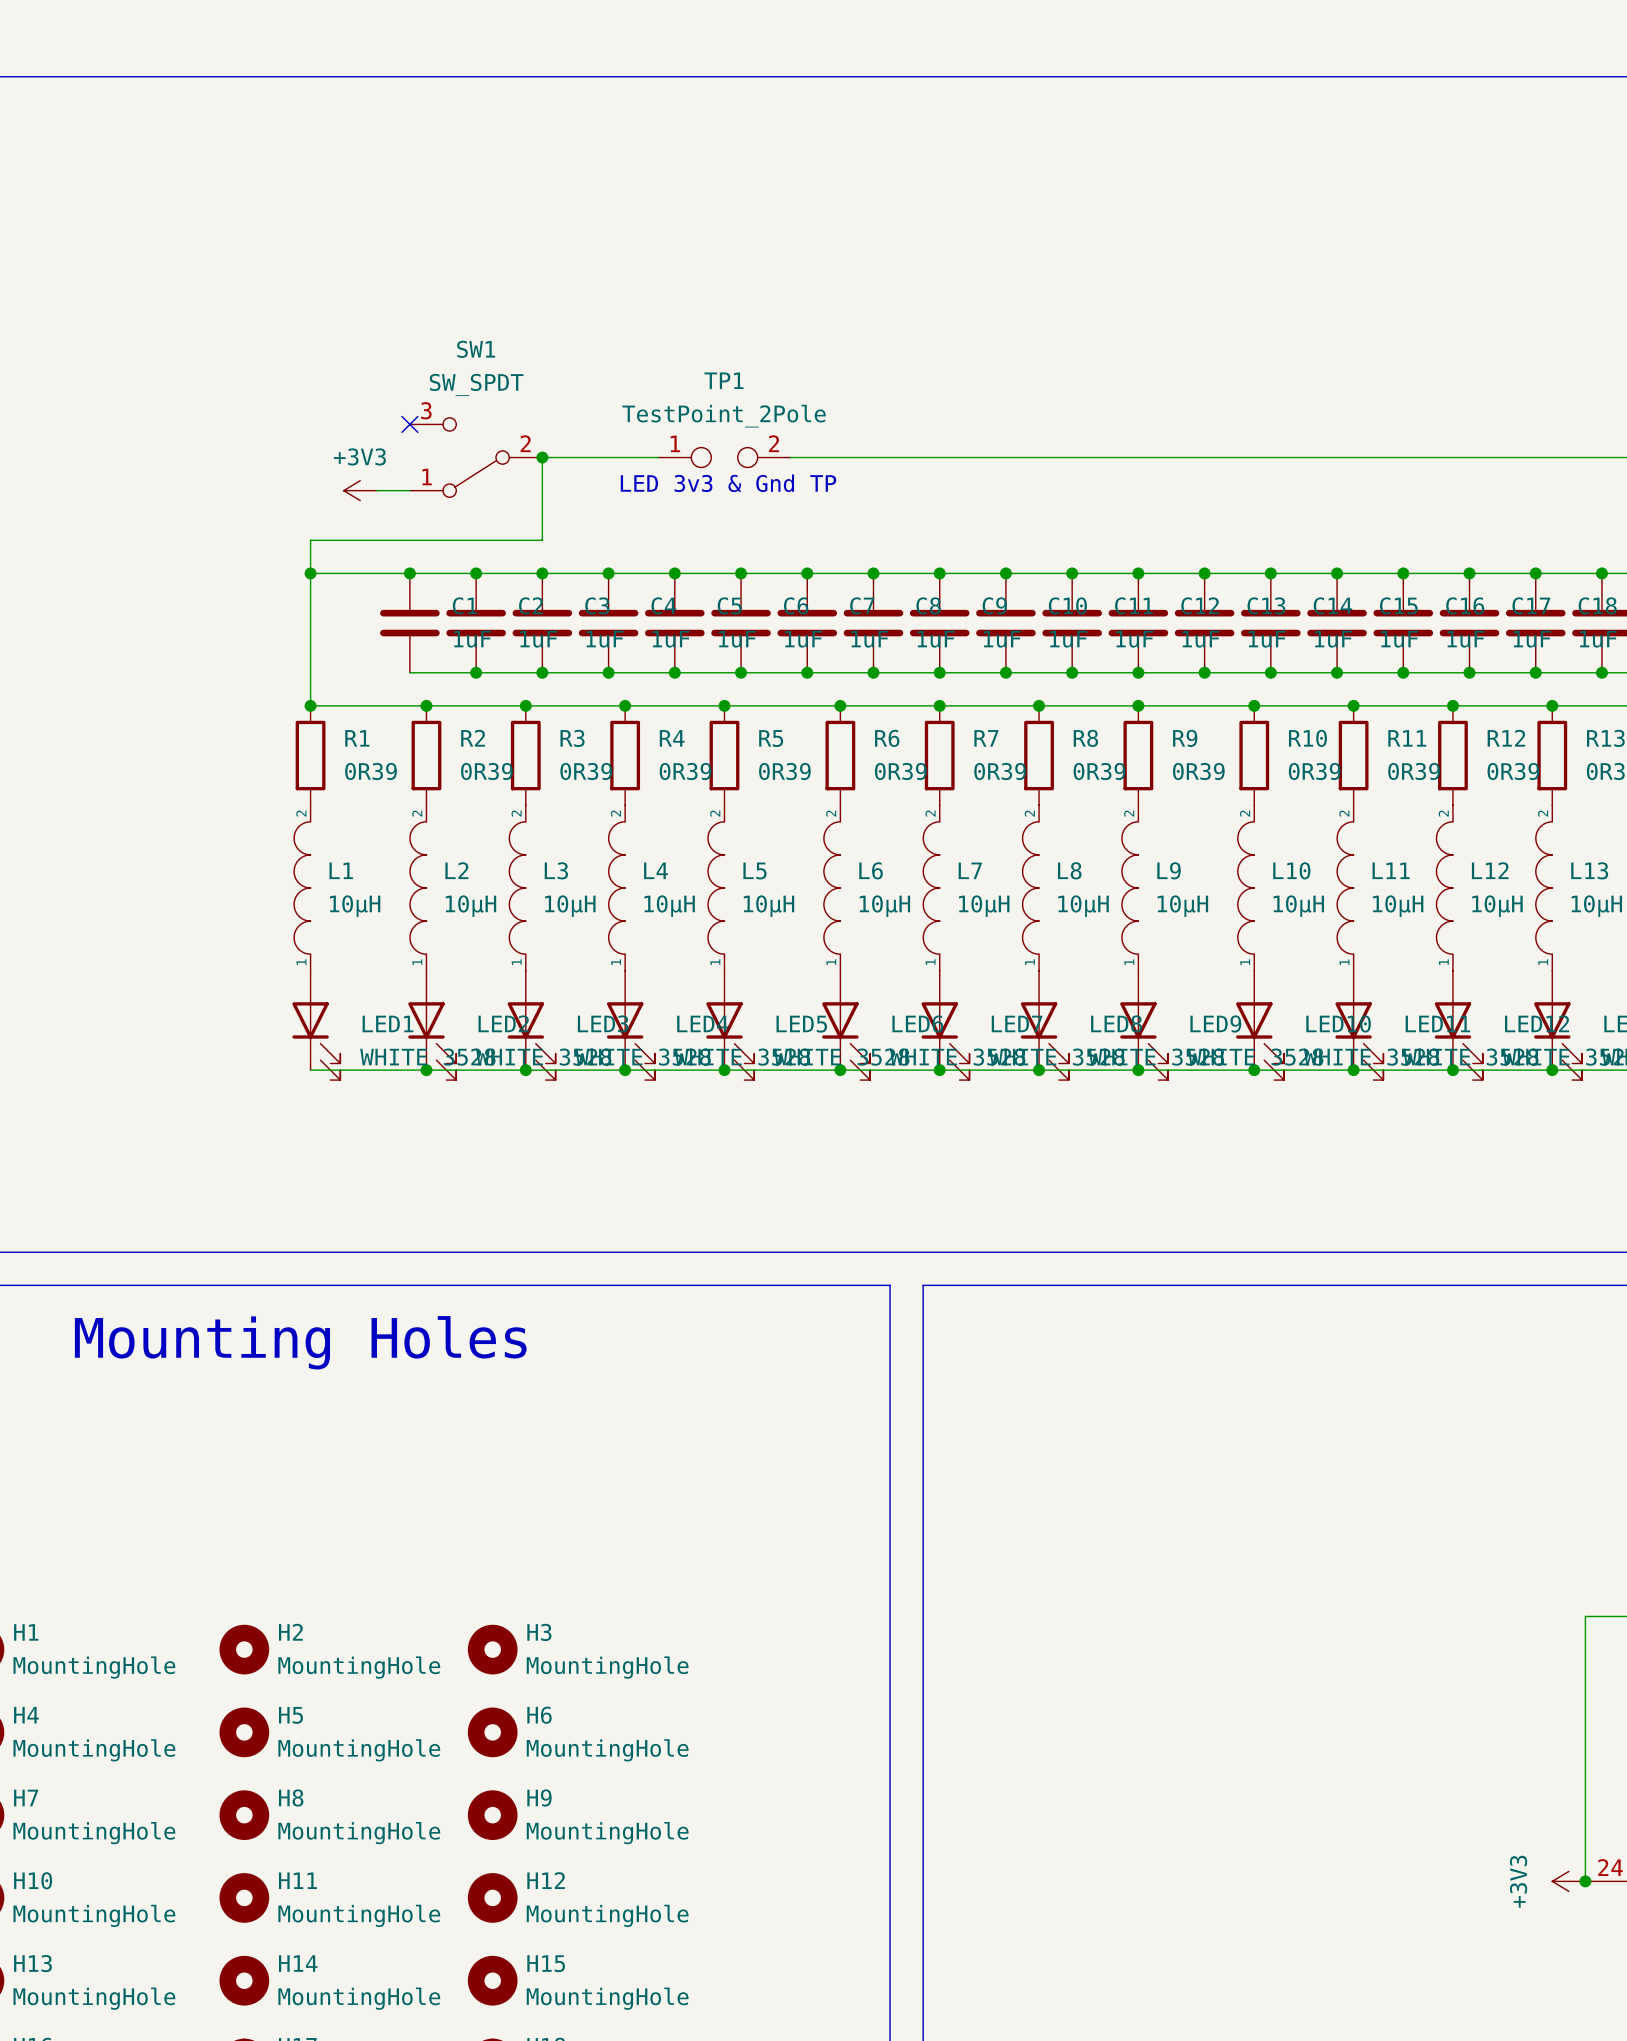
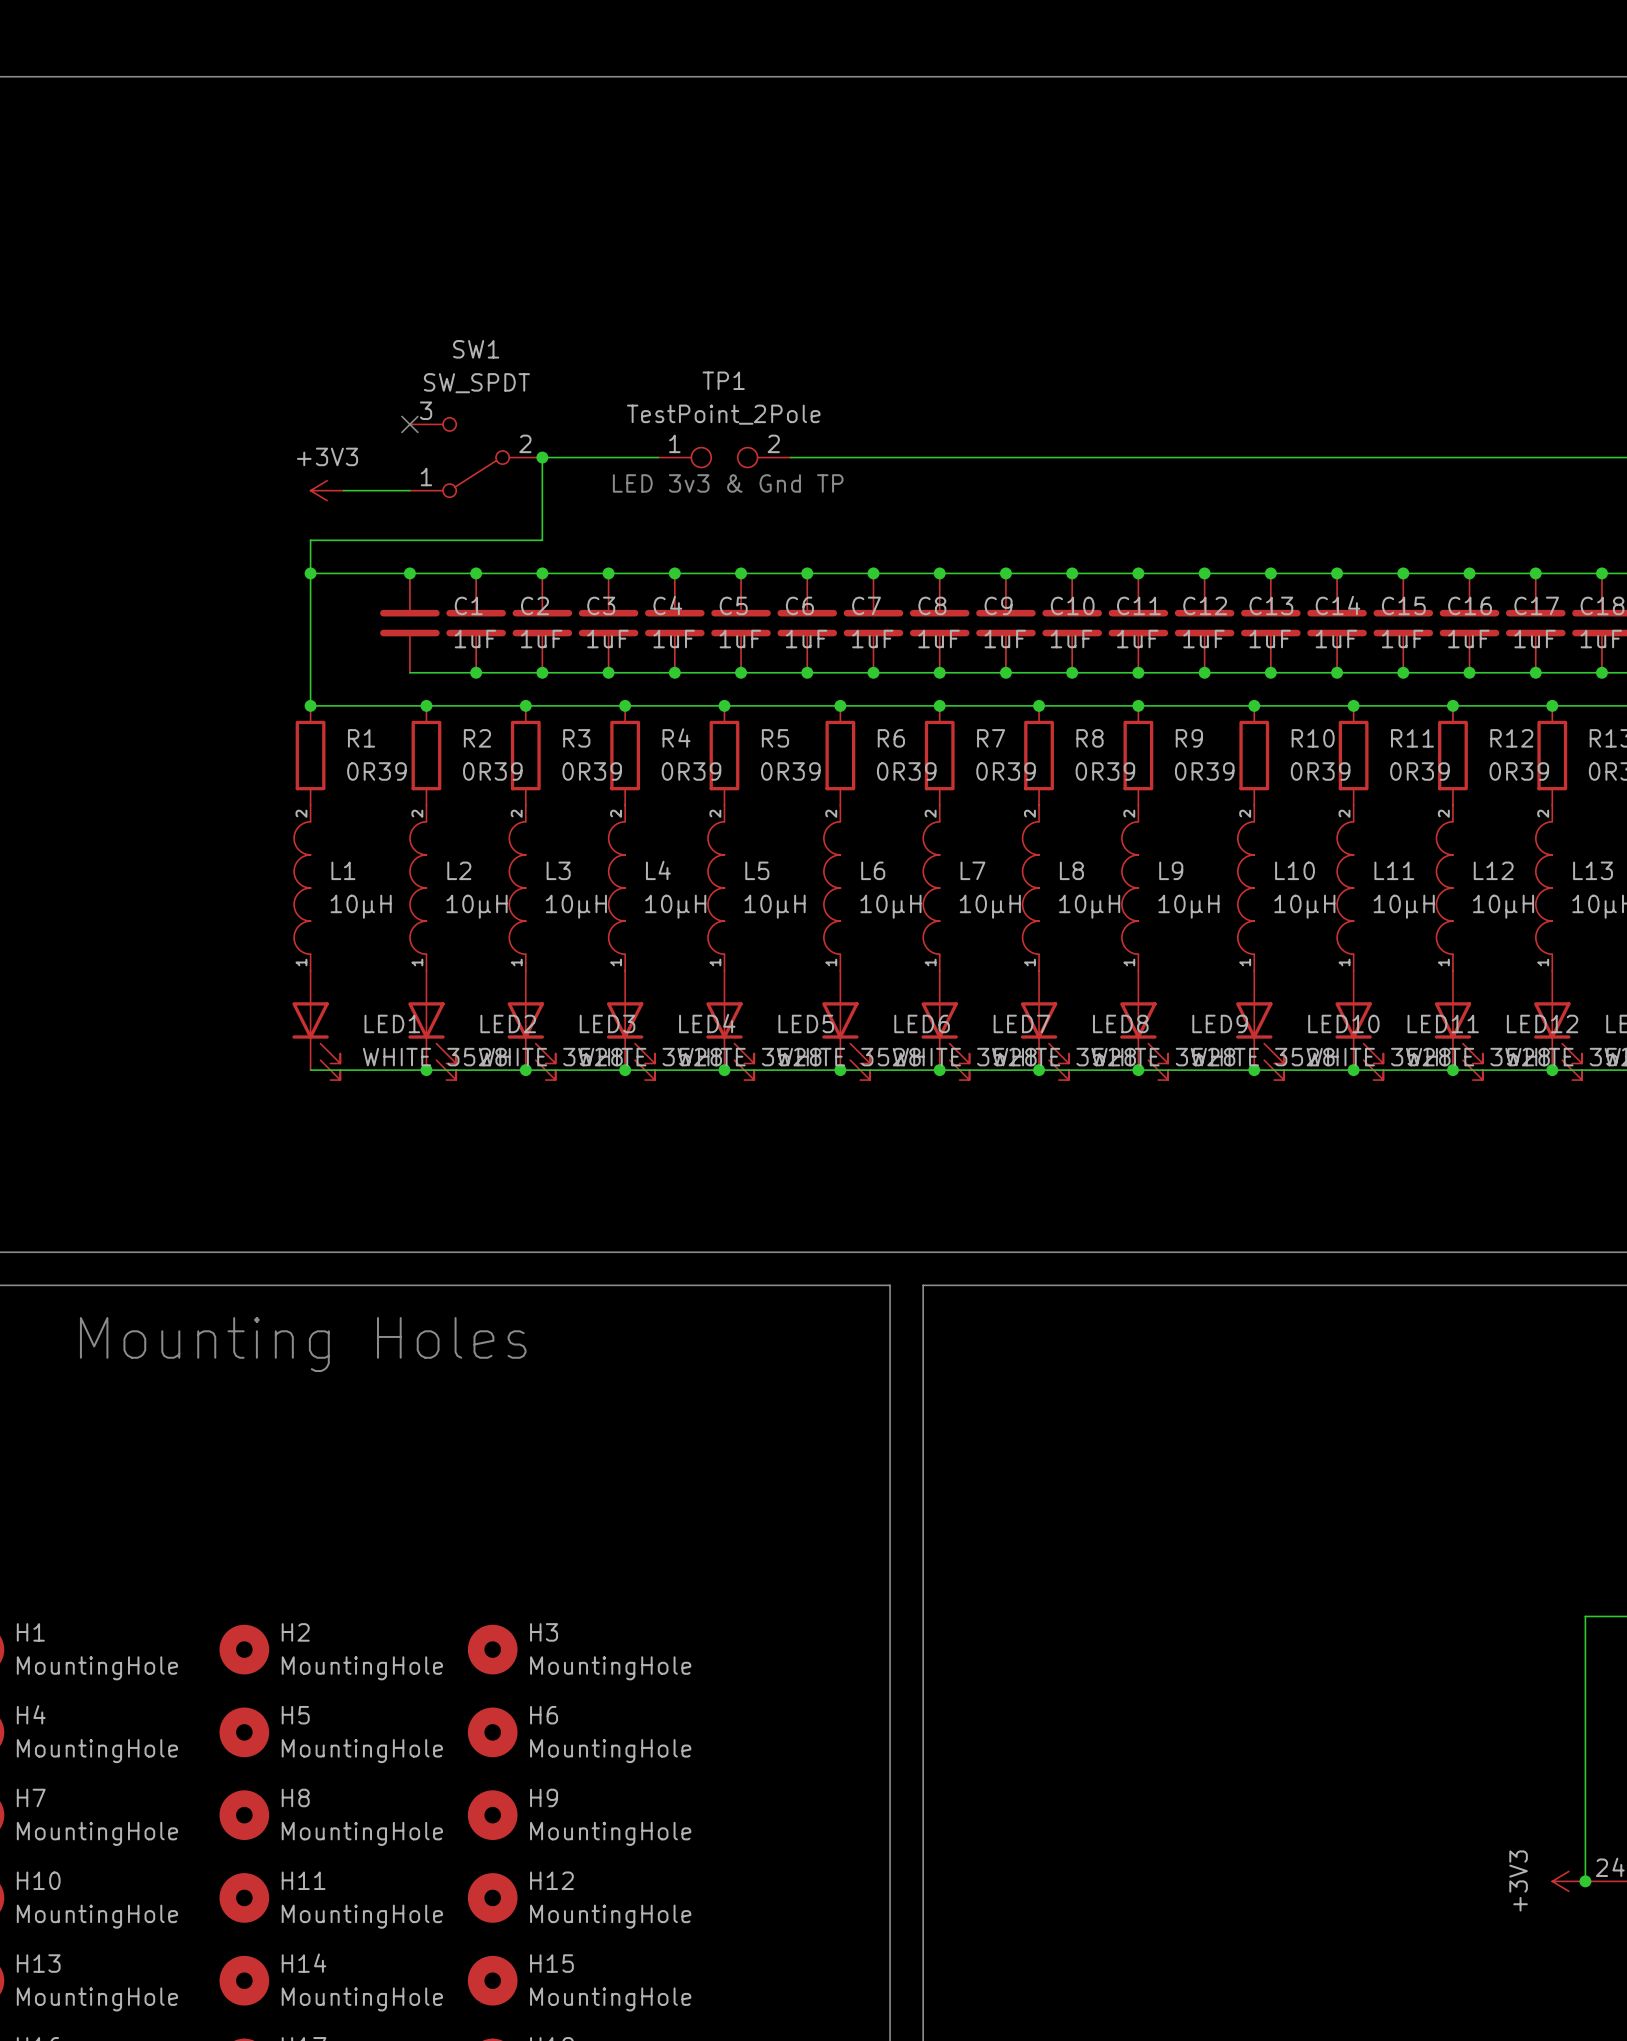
power symbol position: +3V3 (360, 490) -> +3V3 (327, 490)

